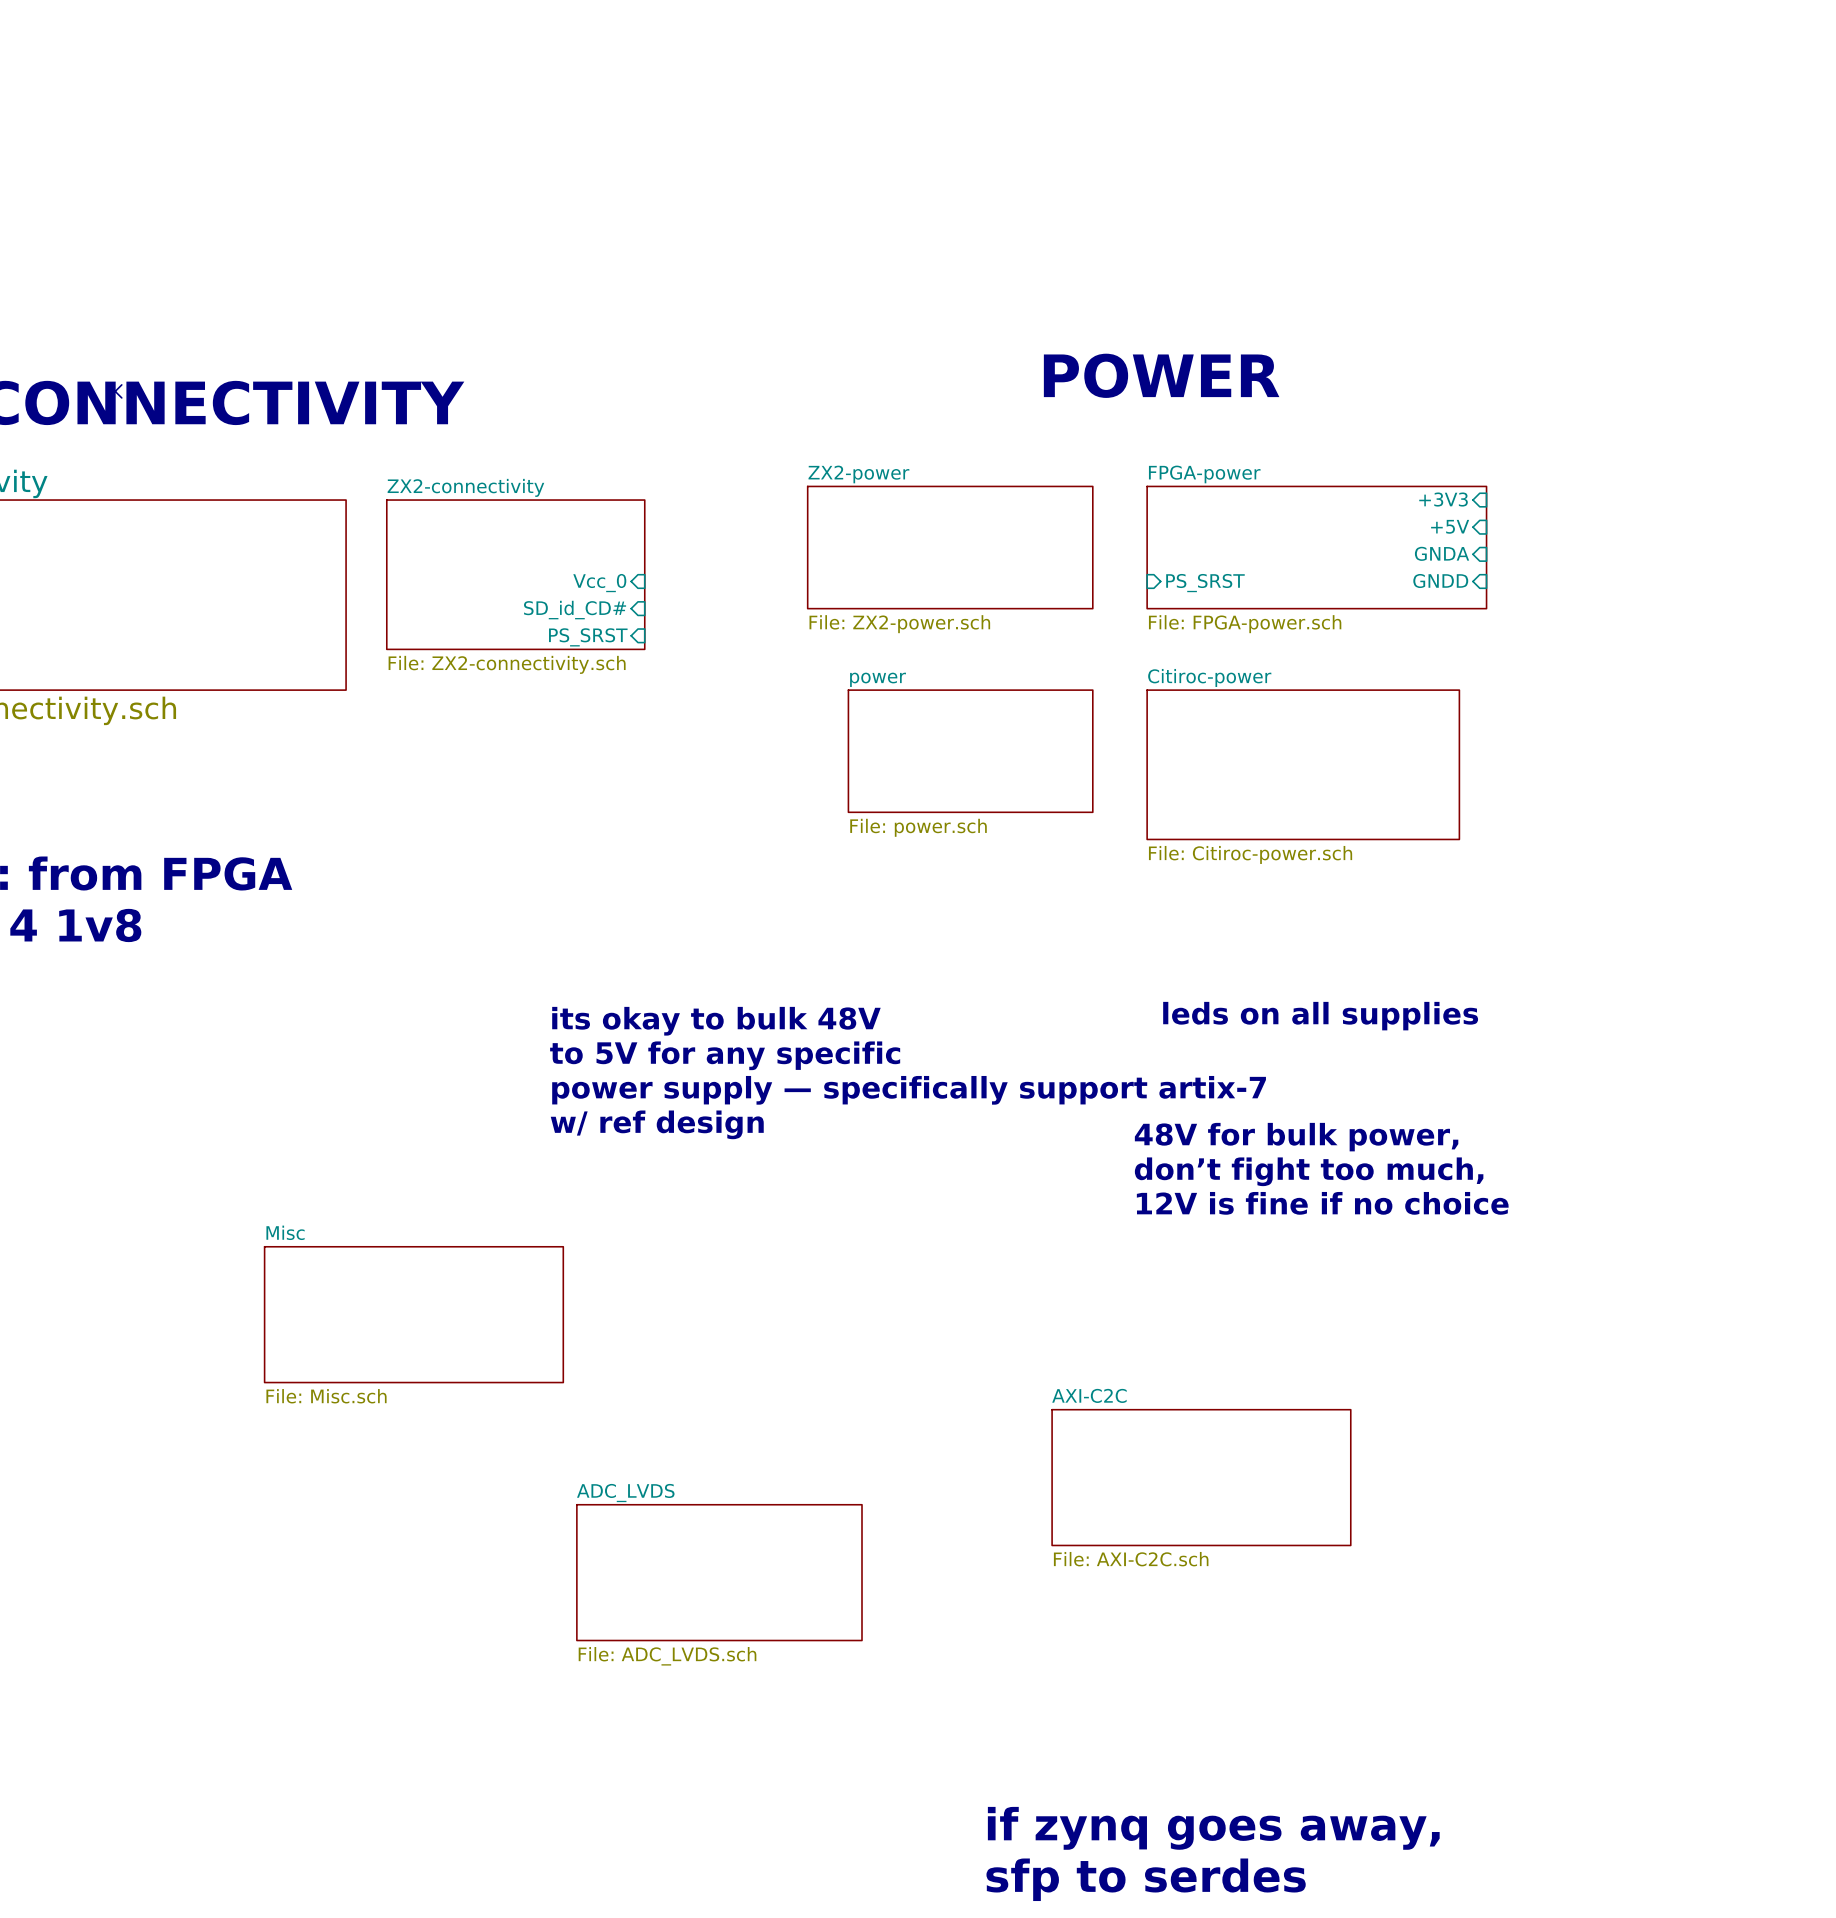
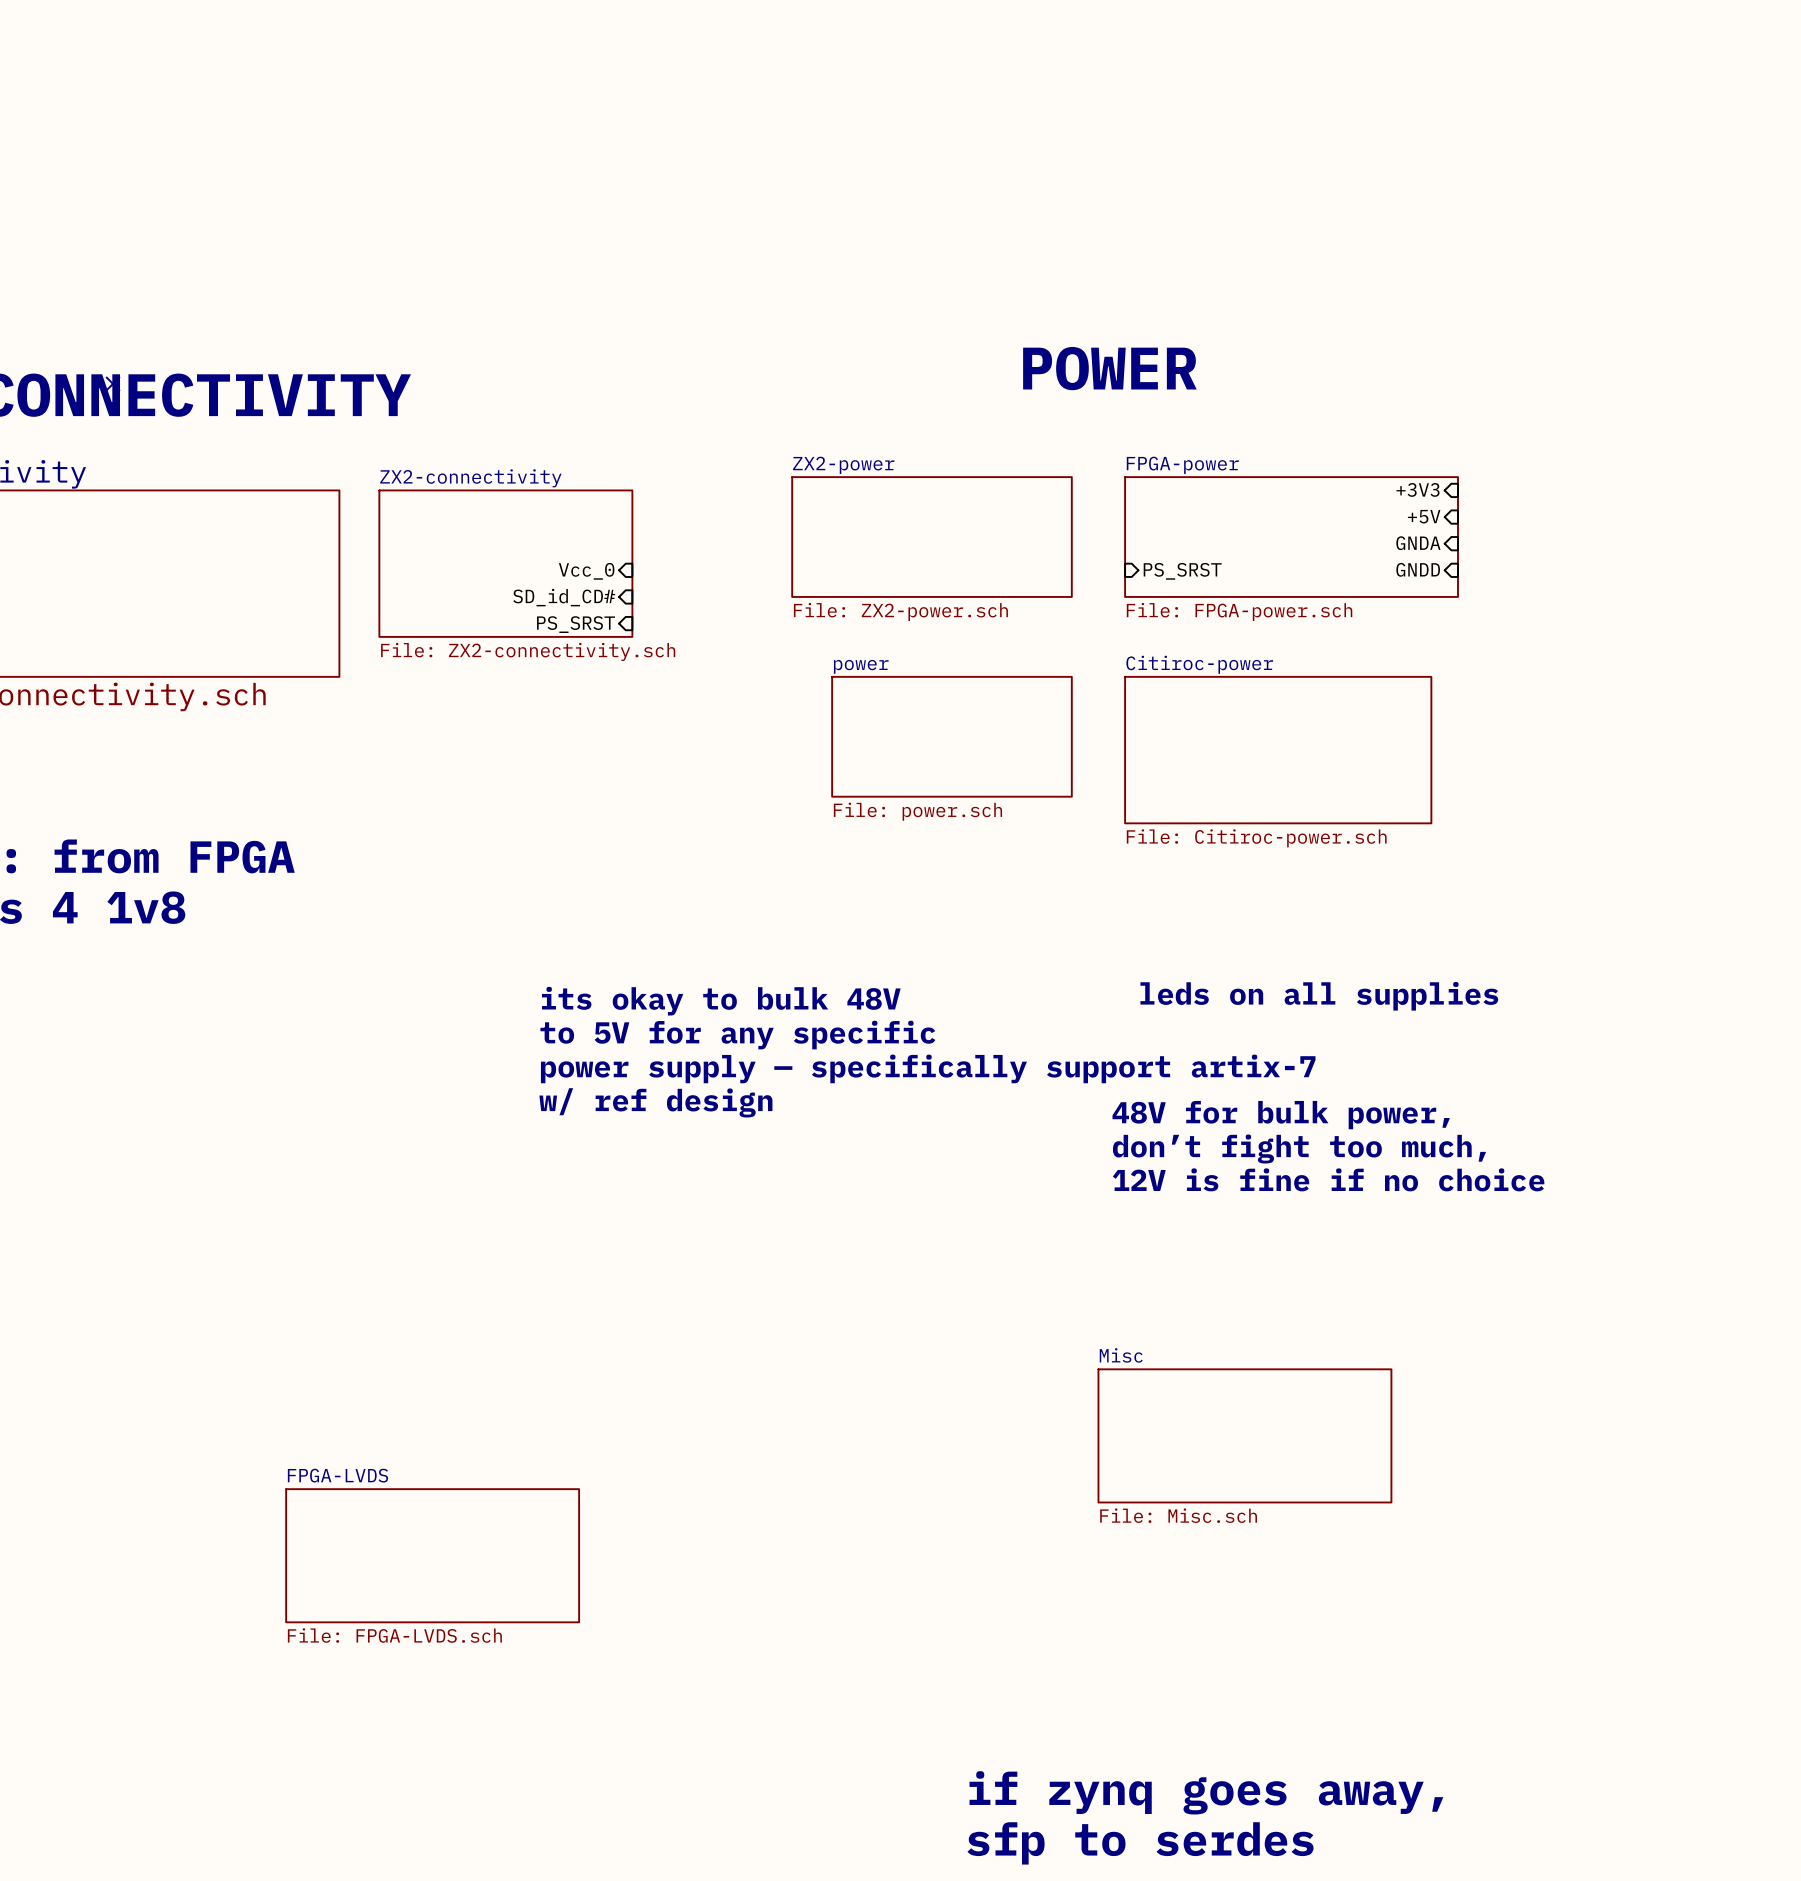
sheet Misc: File: Misc.sch (413, 1314) -> none
sheet Misc: none -> File: Misc.sch (1244, 1435)
sheet AXI-C2C: File: AXI-C2C.sch (1201, 1477) -> none
sheet ADC_LVDS: File: ADC_LVDS.sch (719, 1572) -> none
sheet FPGA-LVDS: none -> File: FPGA-LVDS.sch (432, 1555)

